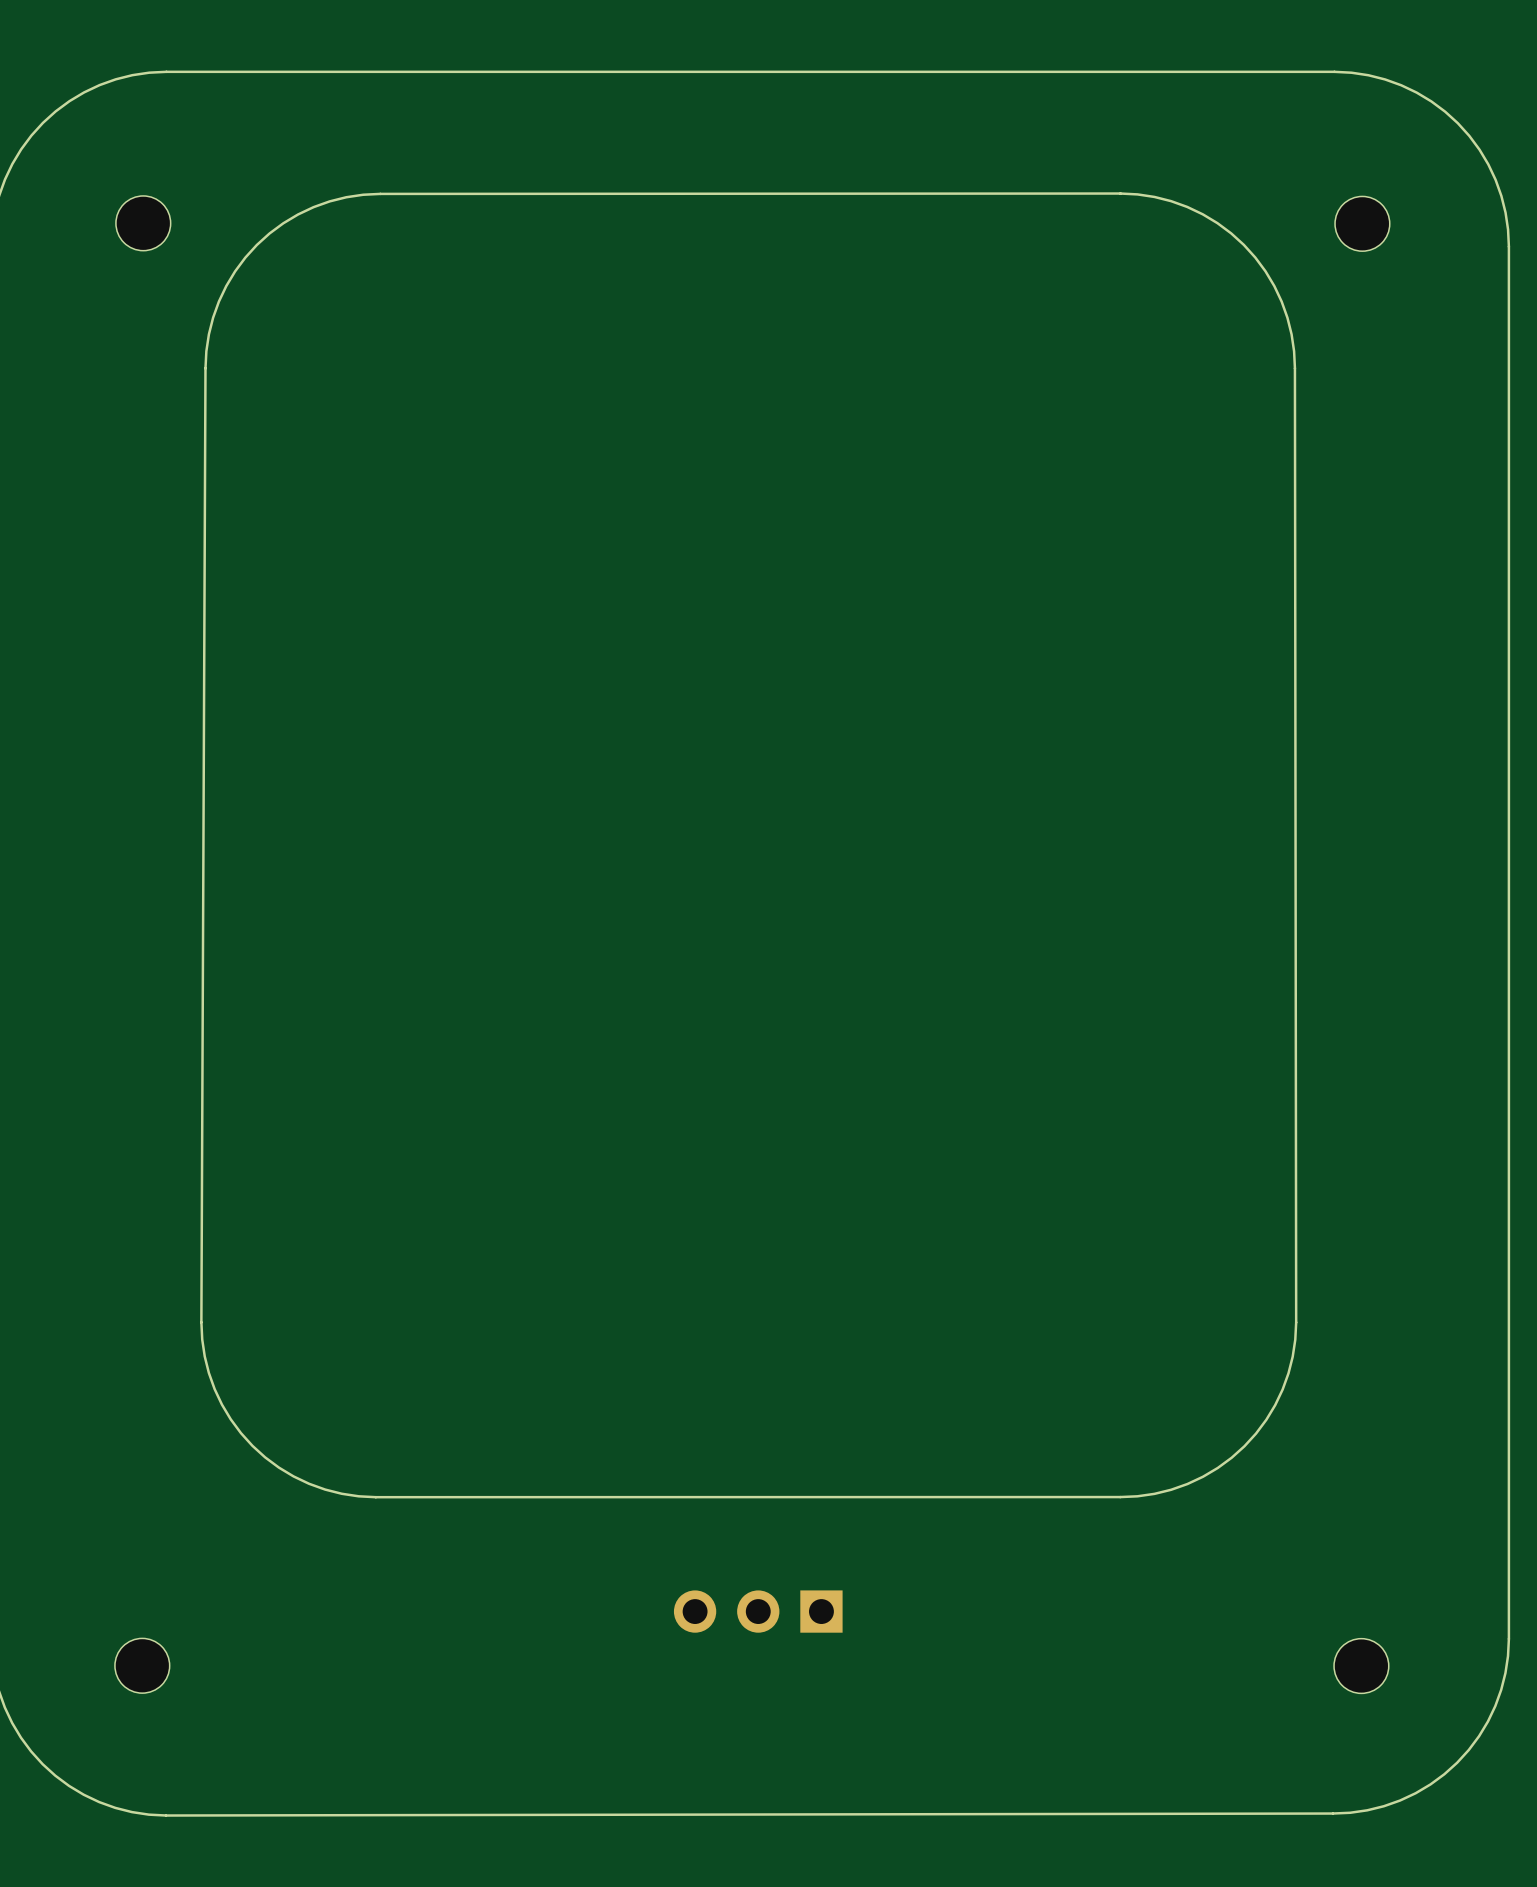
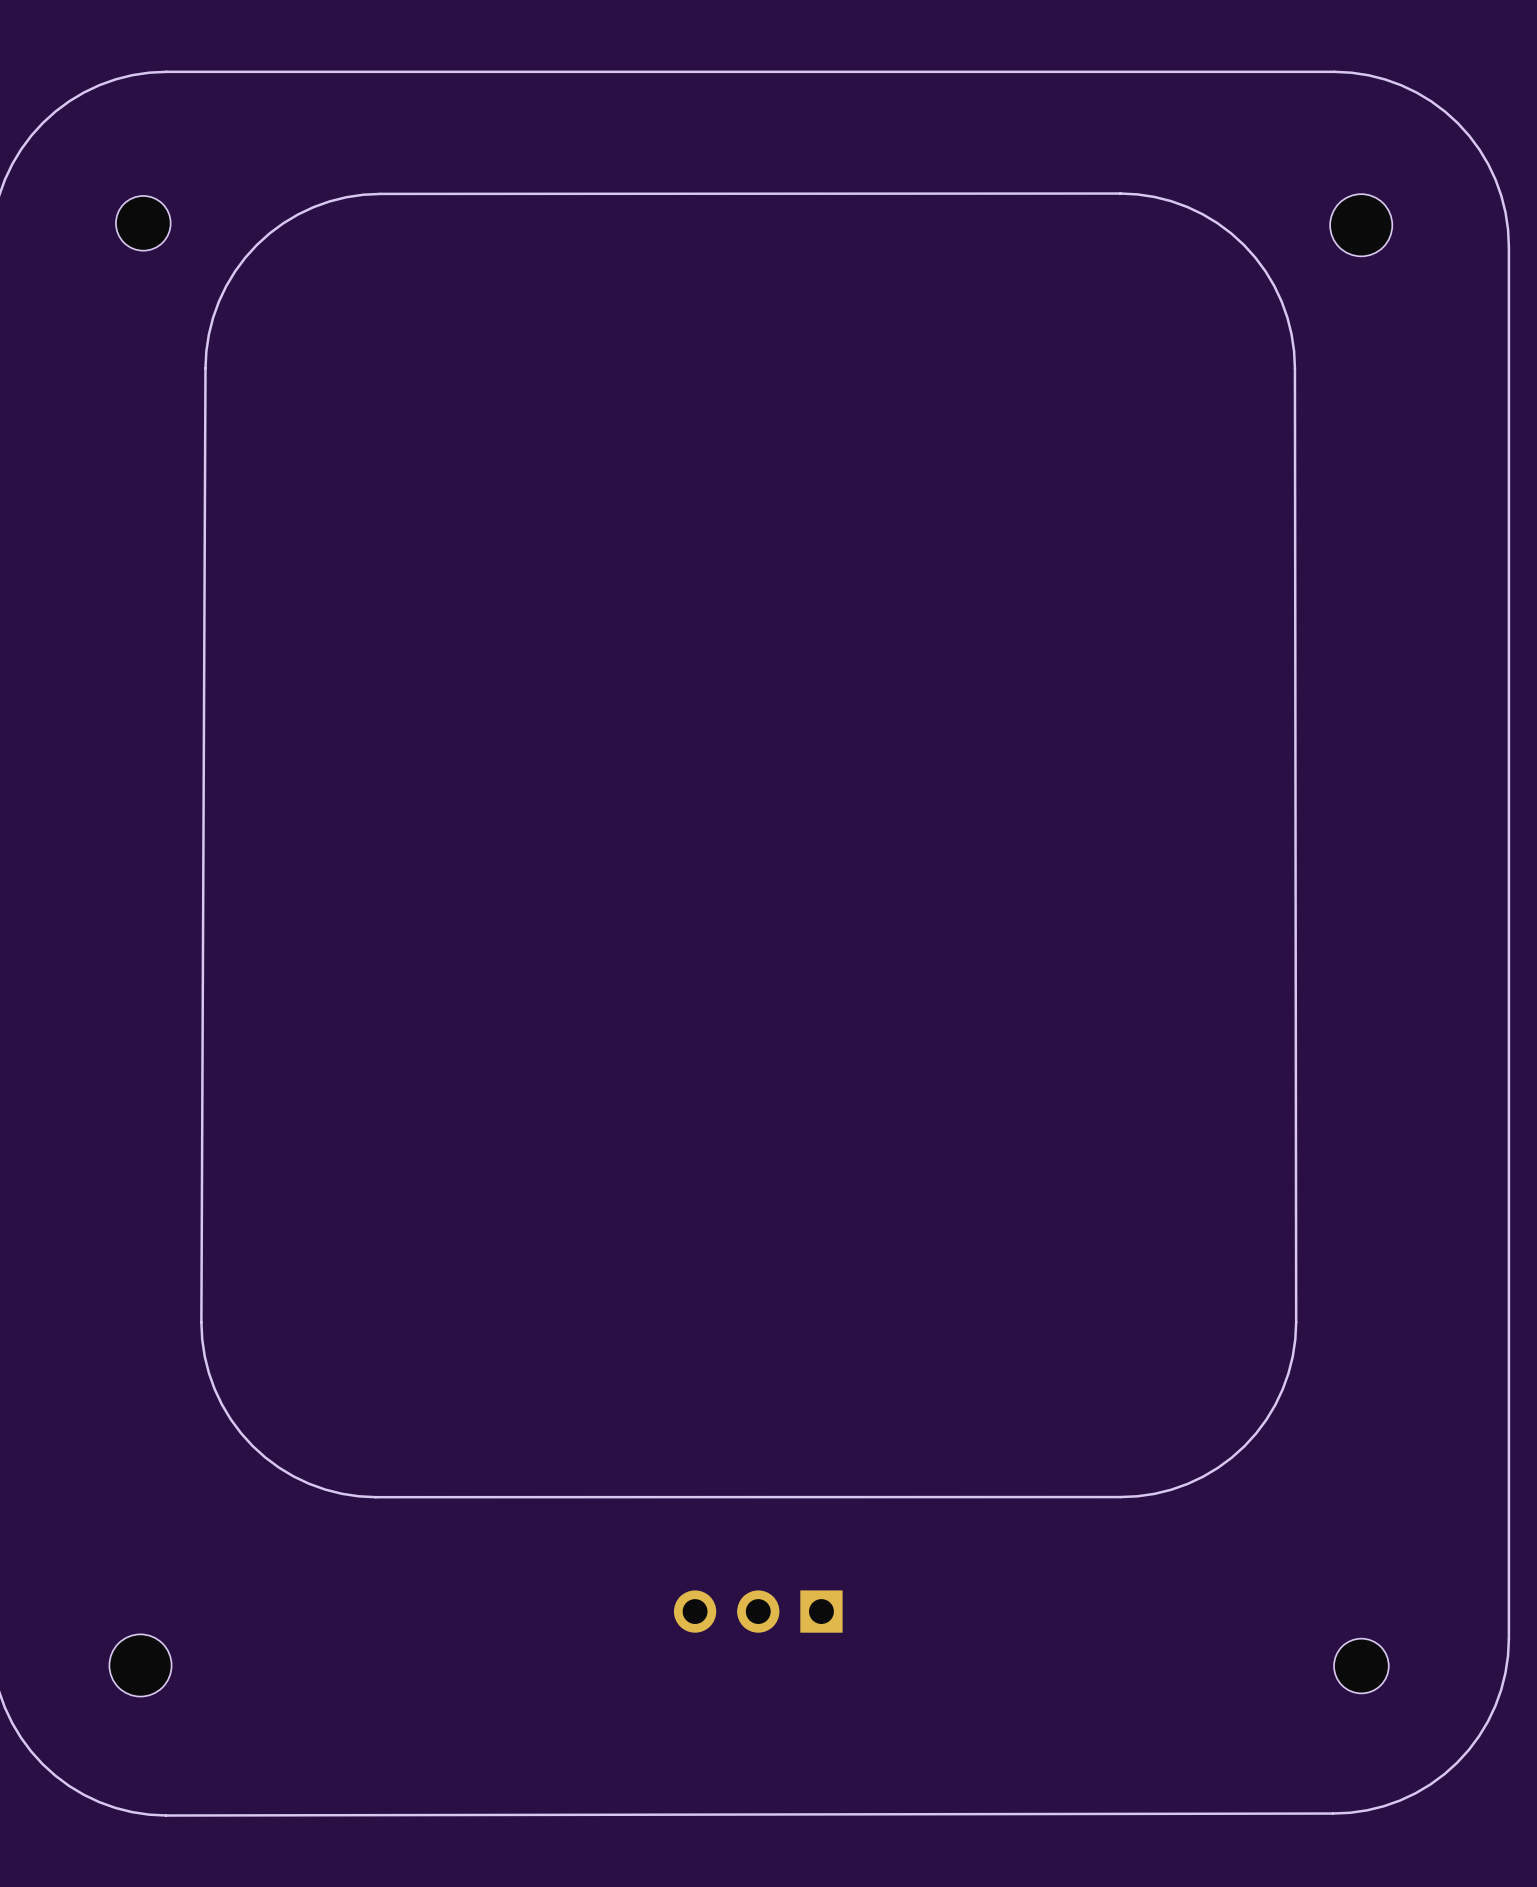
part footprint: [1335, 196, 1390, 252] -> [1330, 194, 1393, 257]
part footprint: [114, 1638, 170, 1694] -> [109, 1634, 172, 1697]

